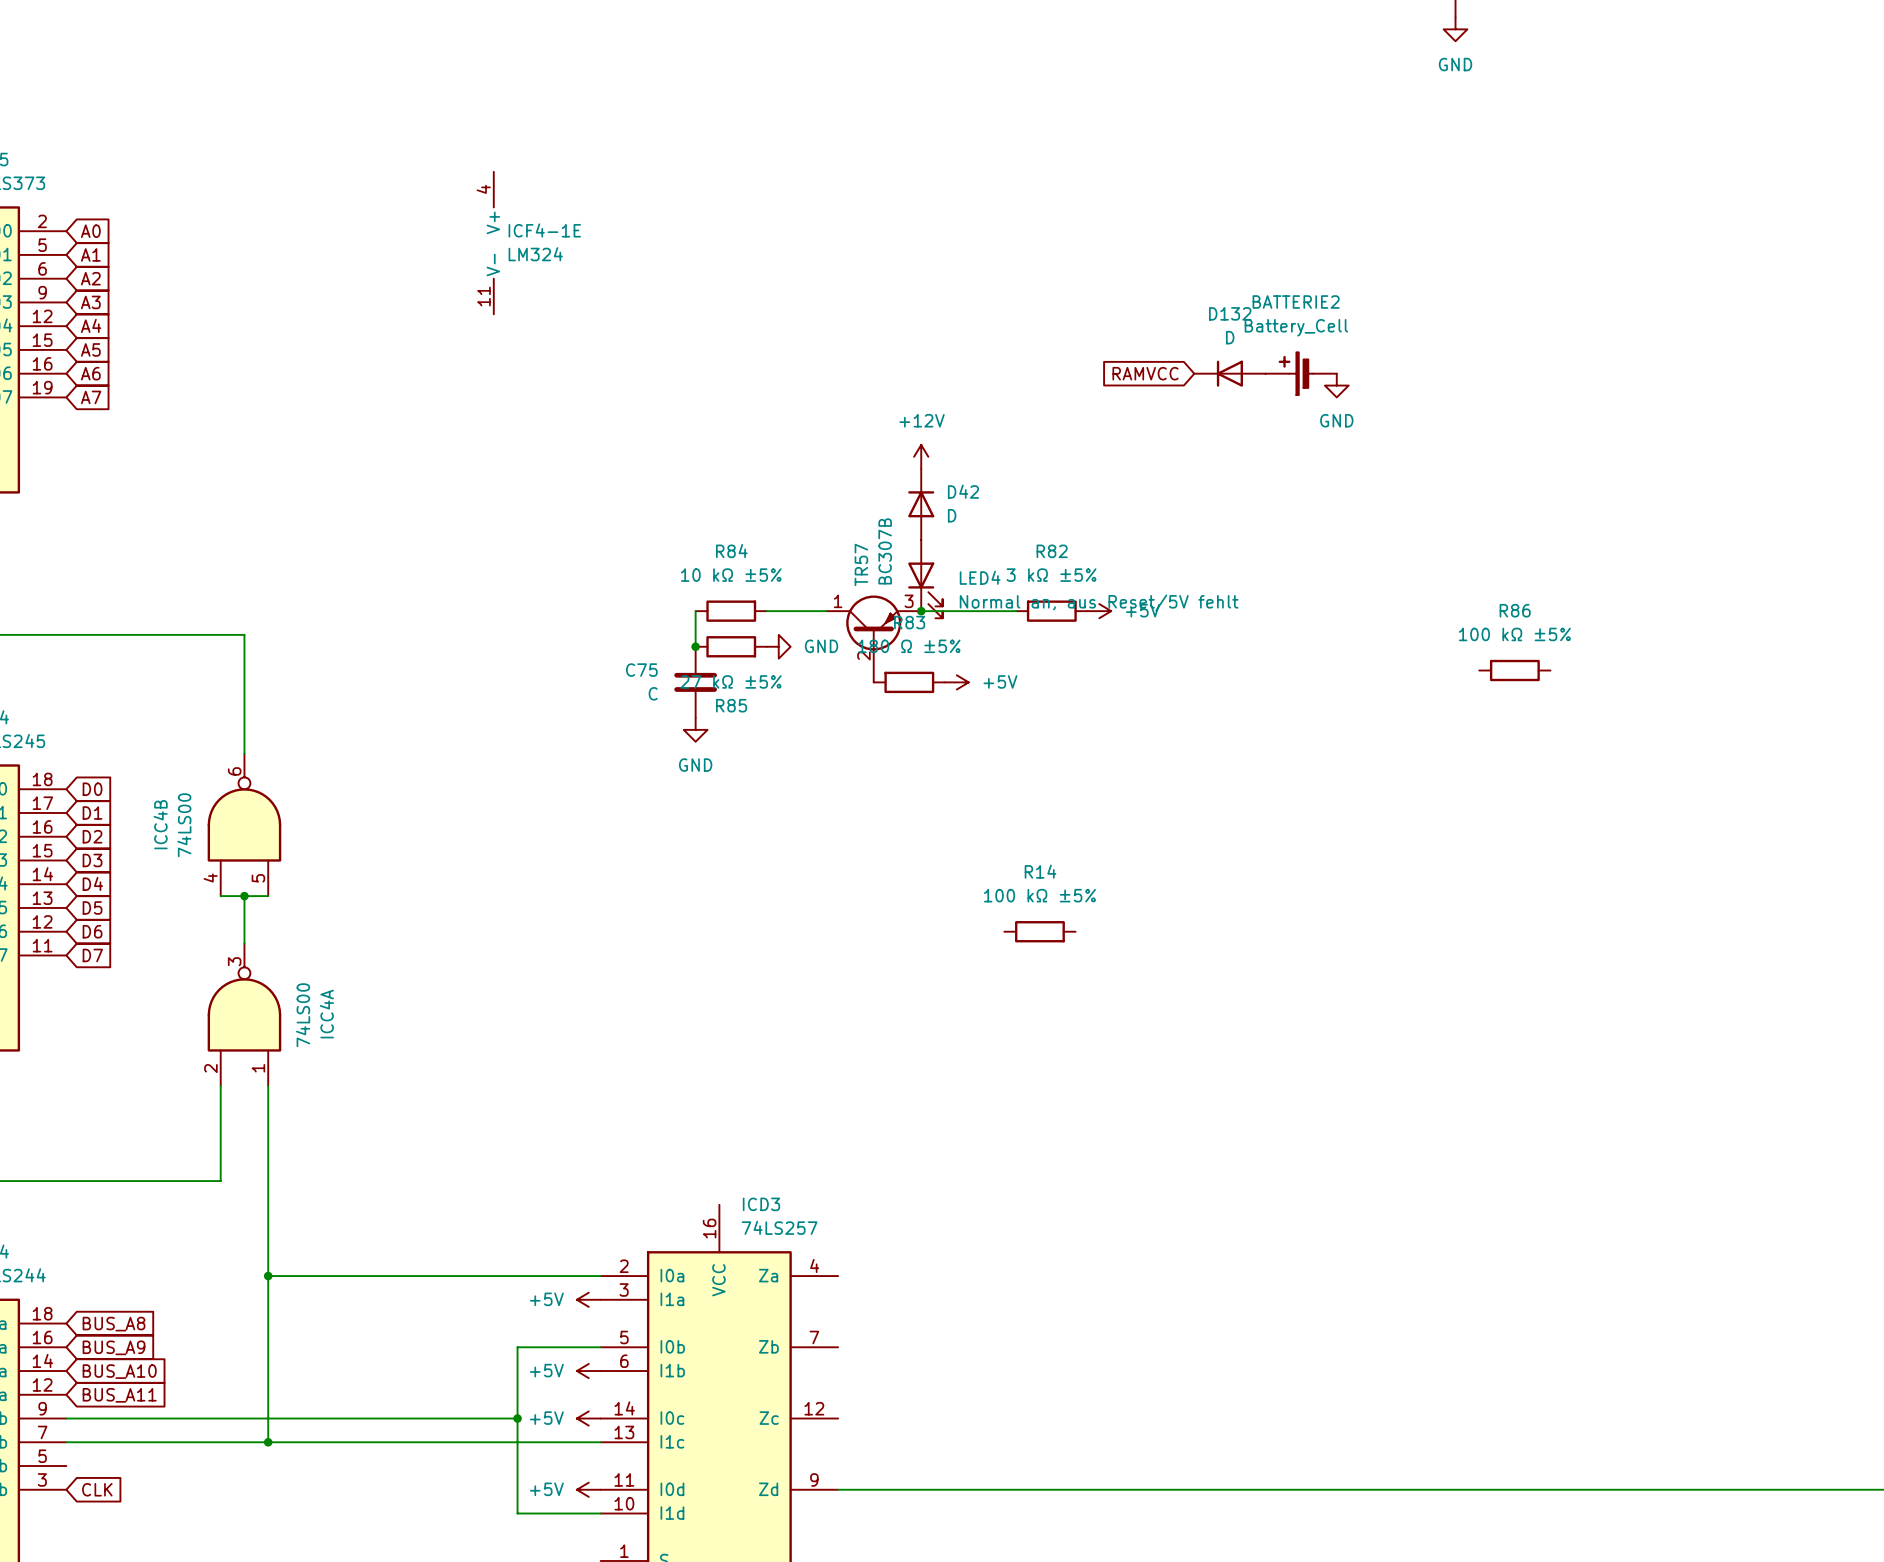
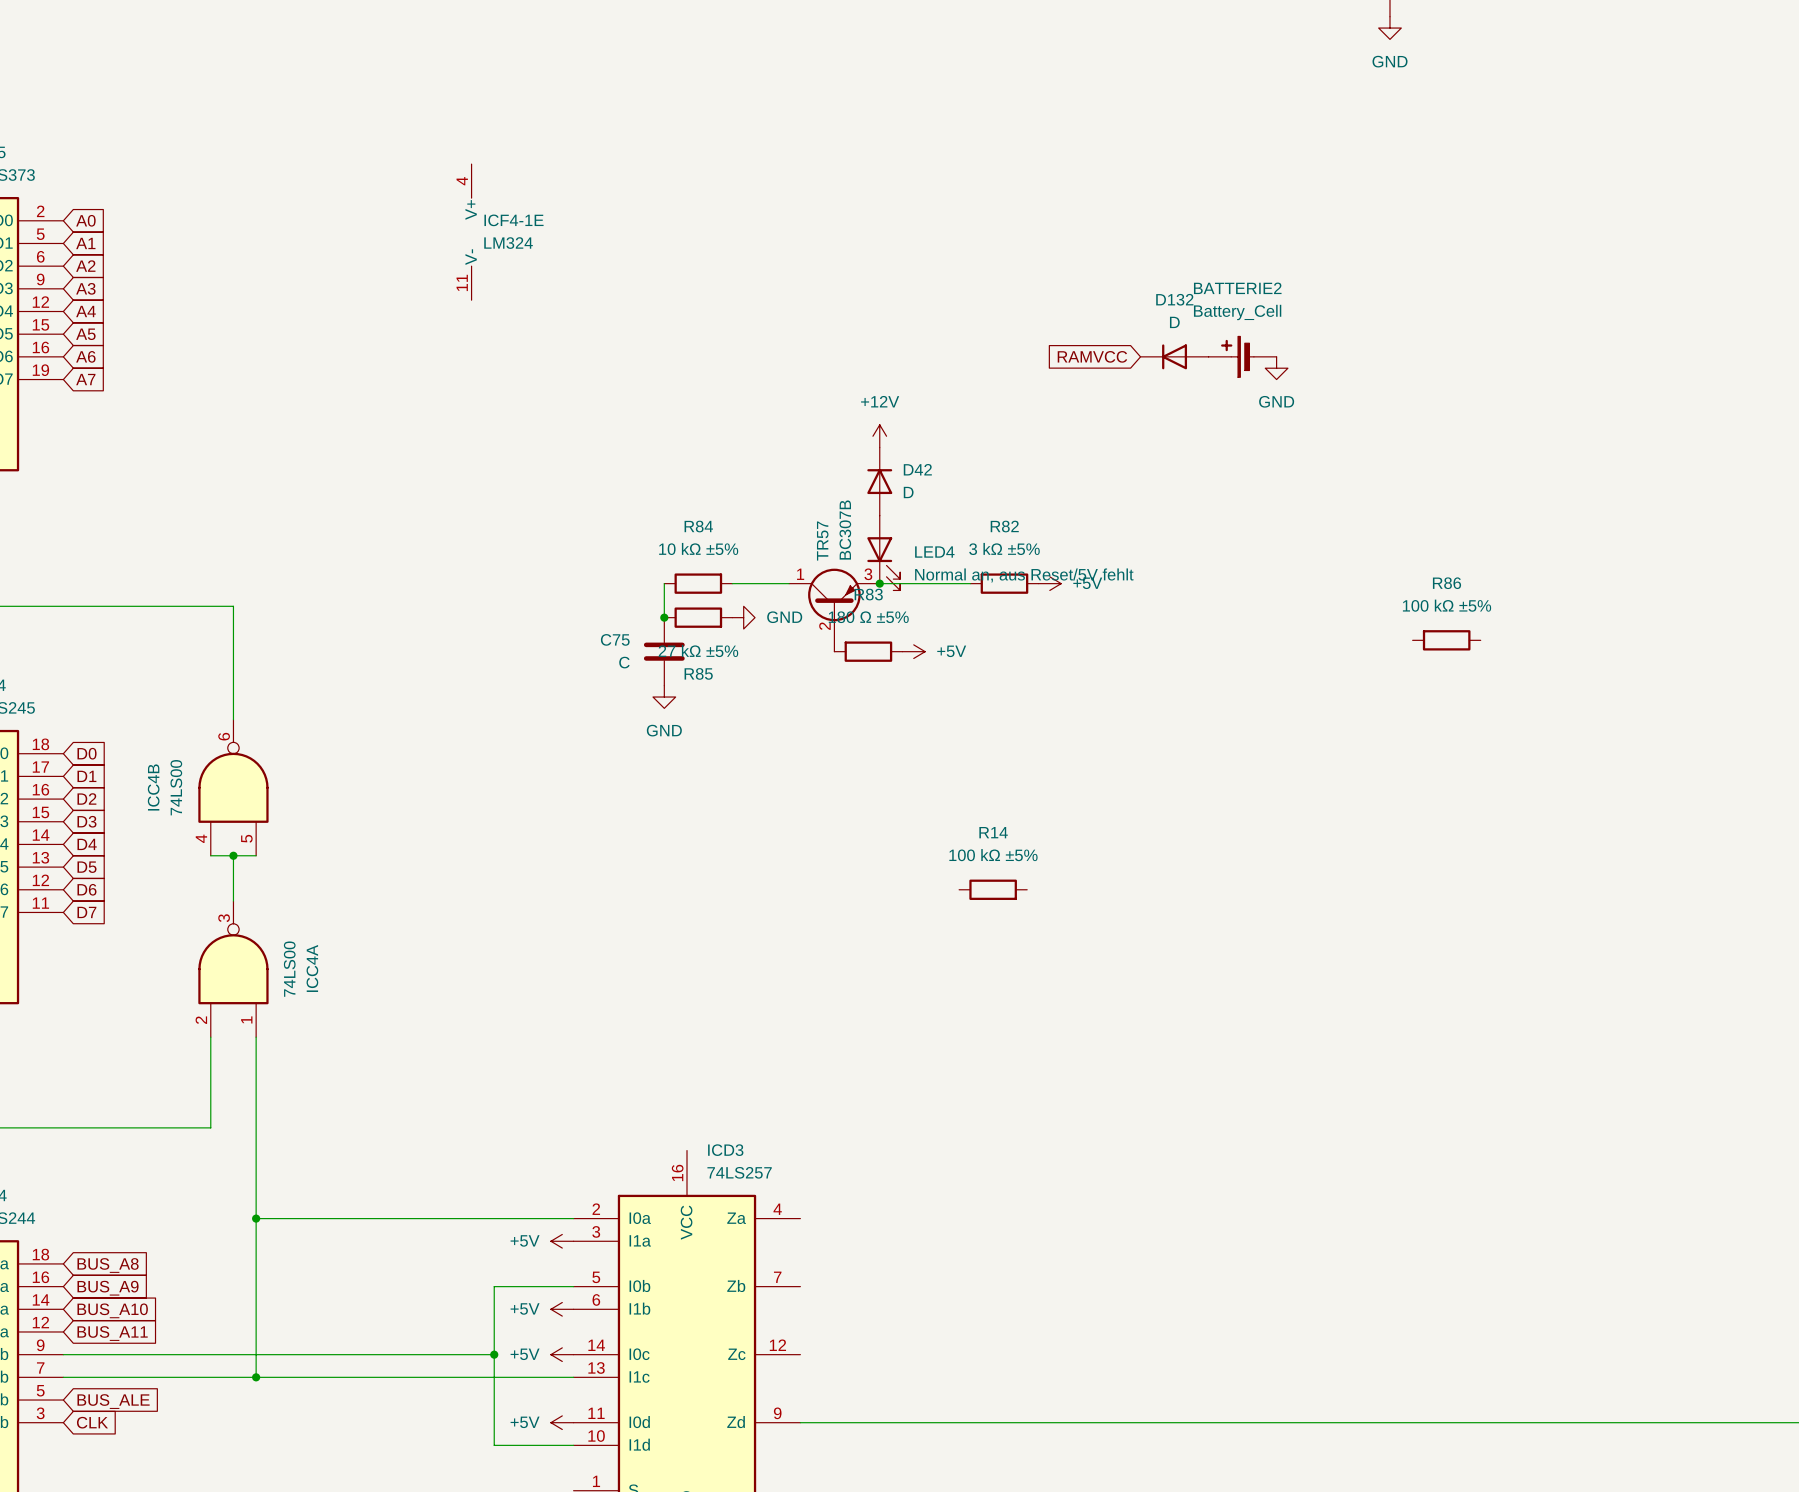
global label: none -> BUS_ALE (113, 1401)

